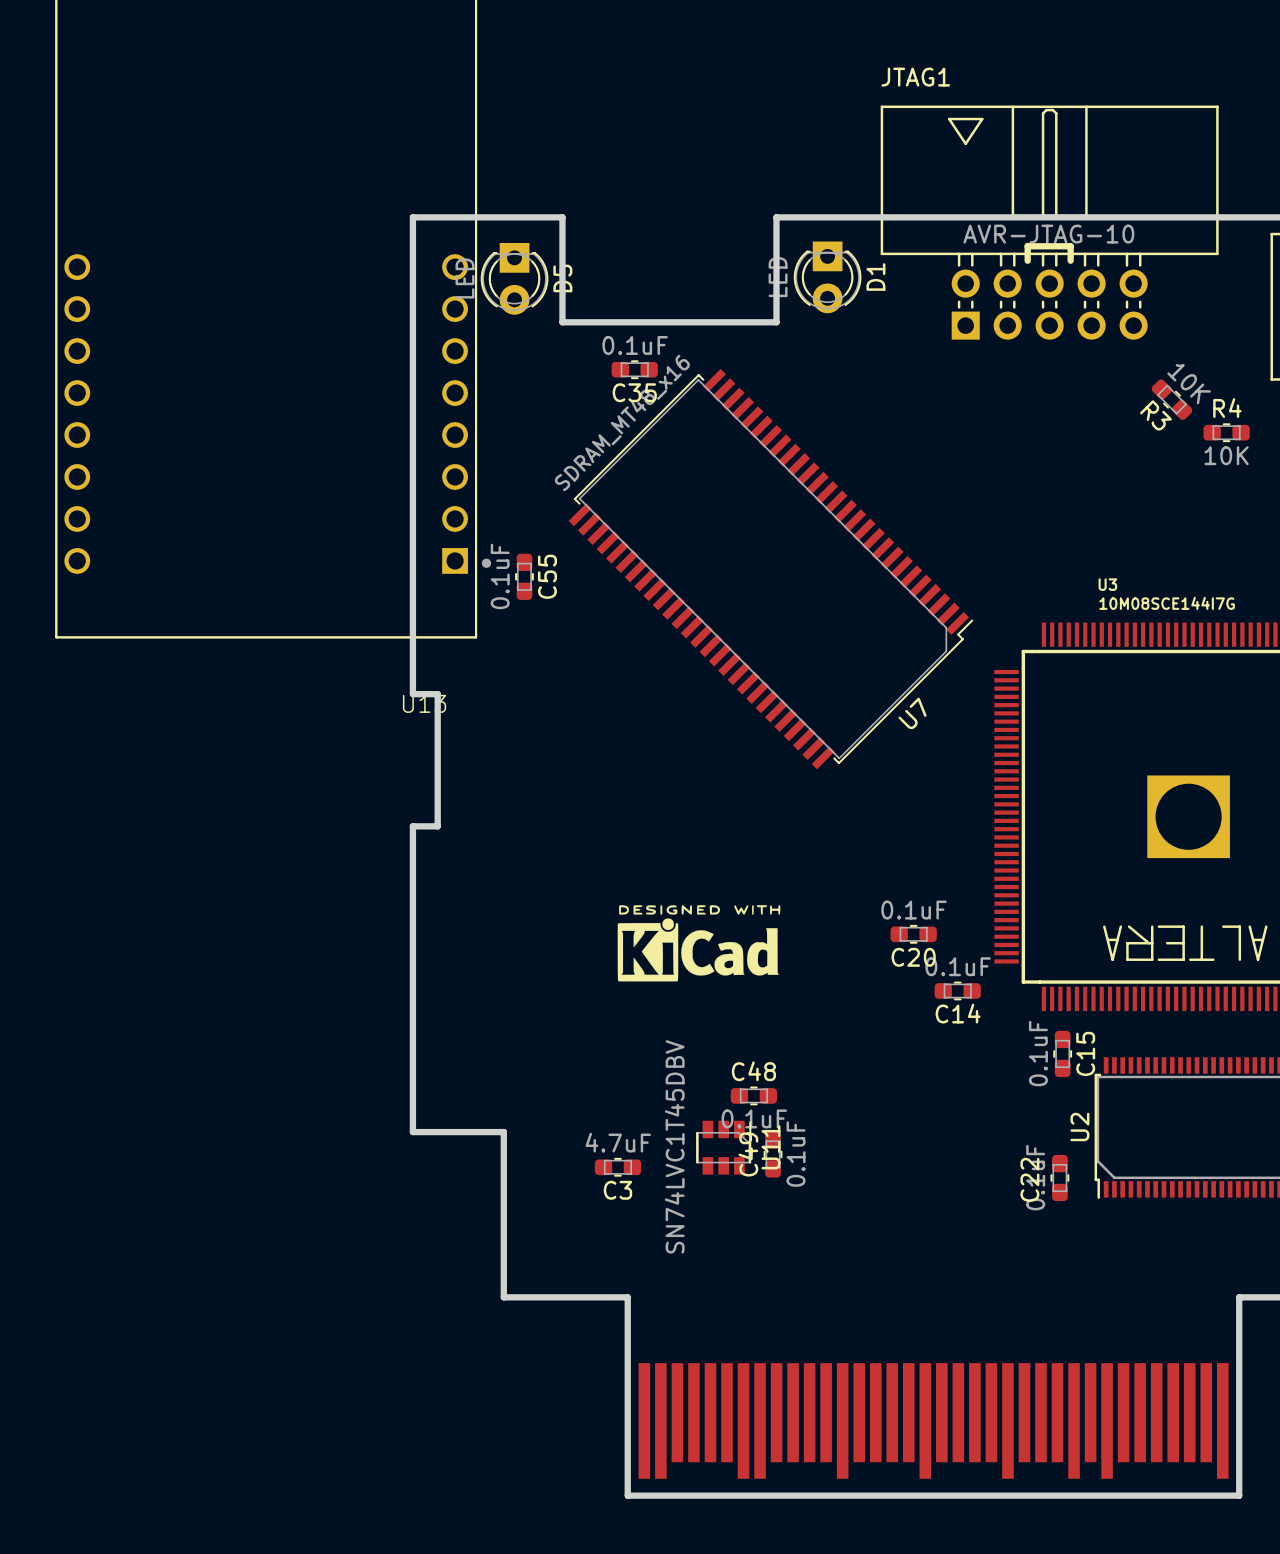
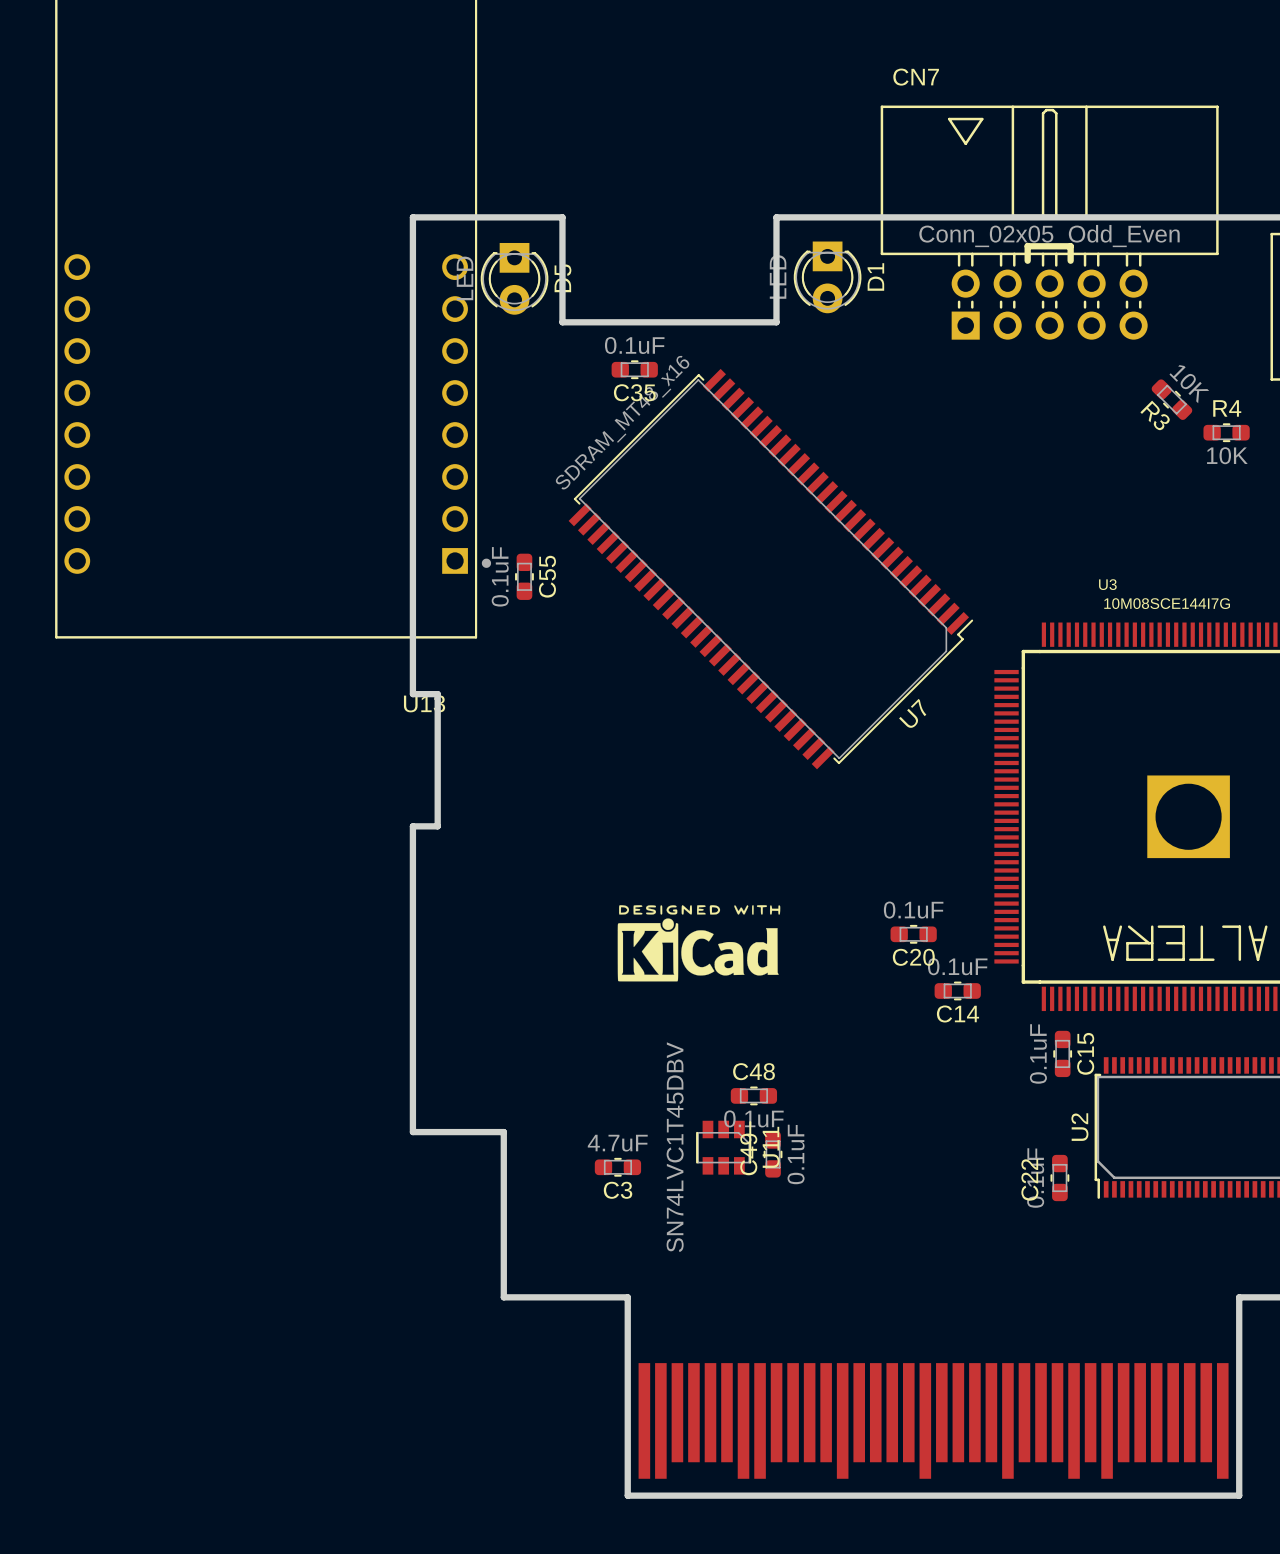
JTAG1 name: JTAG1 (915, 77) -> CN7 (916, 77)
JTAG1 value: AVR-JTAG-10 (1048, 234) -> Conn_02x05_Odd_Even (1049, 236)

